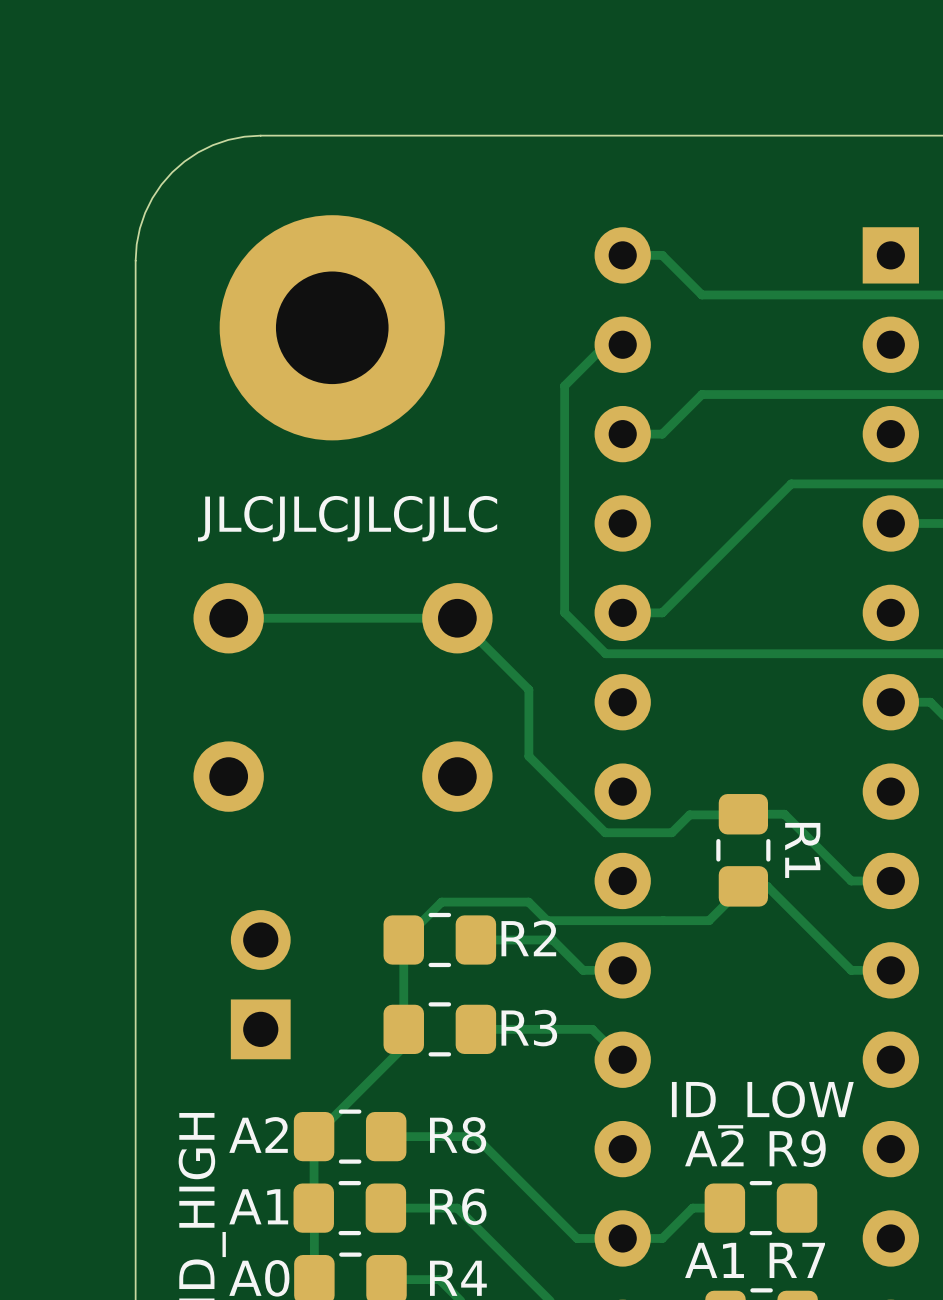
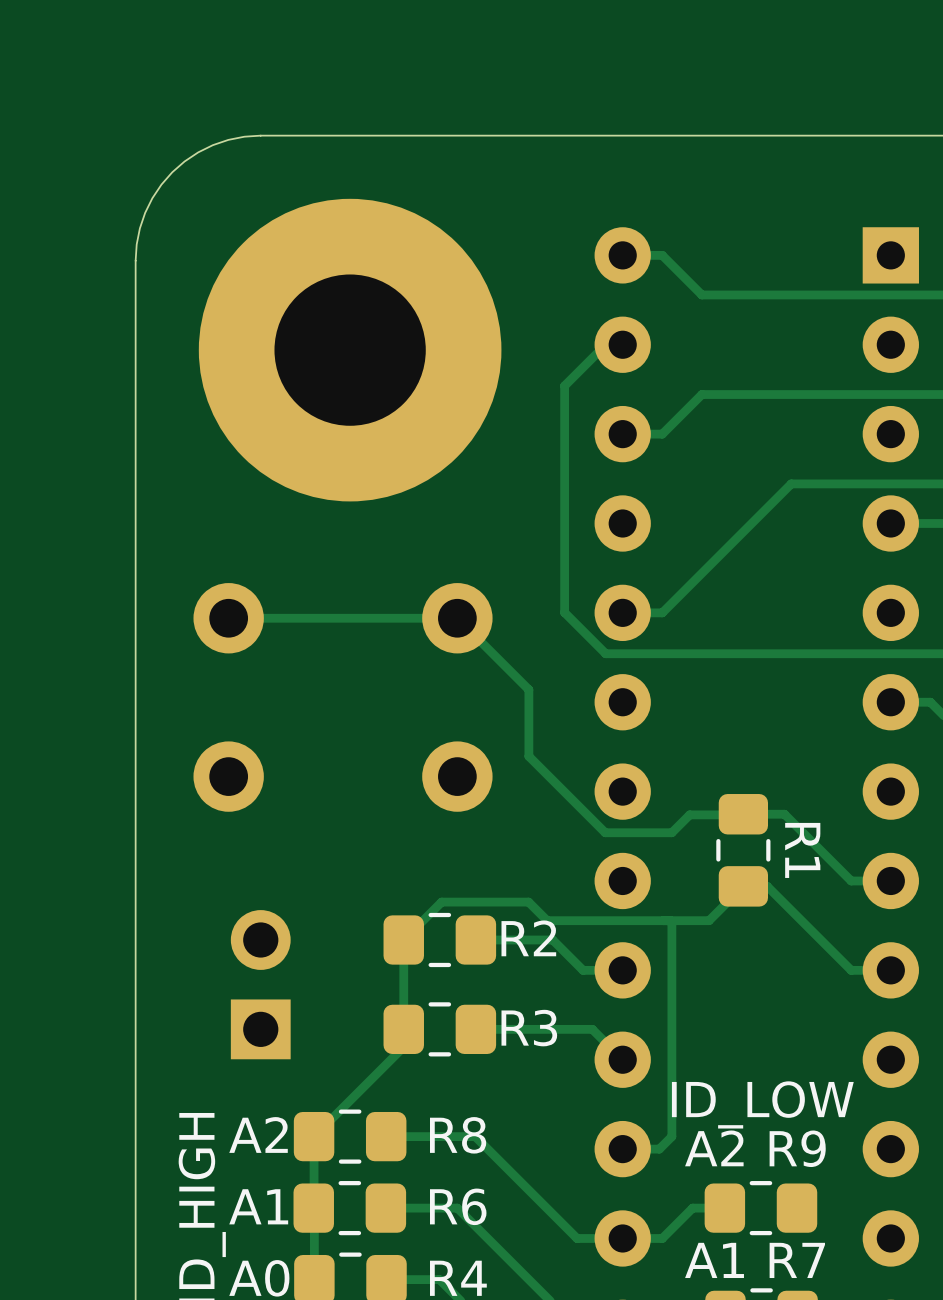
part footprint: [219, 215, 445, 441] -> [198, 198, 502, 502]
text: JLCJLCJLCJLC (347, 518) -> none
track: none -> (670, 920) (671, 1136) (659, 1149) (602, 1149)

